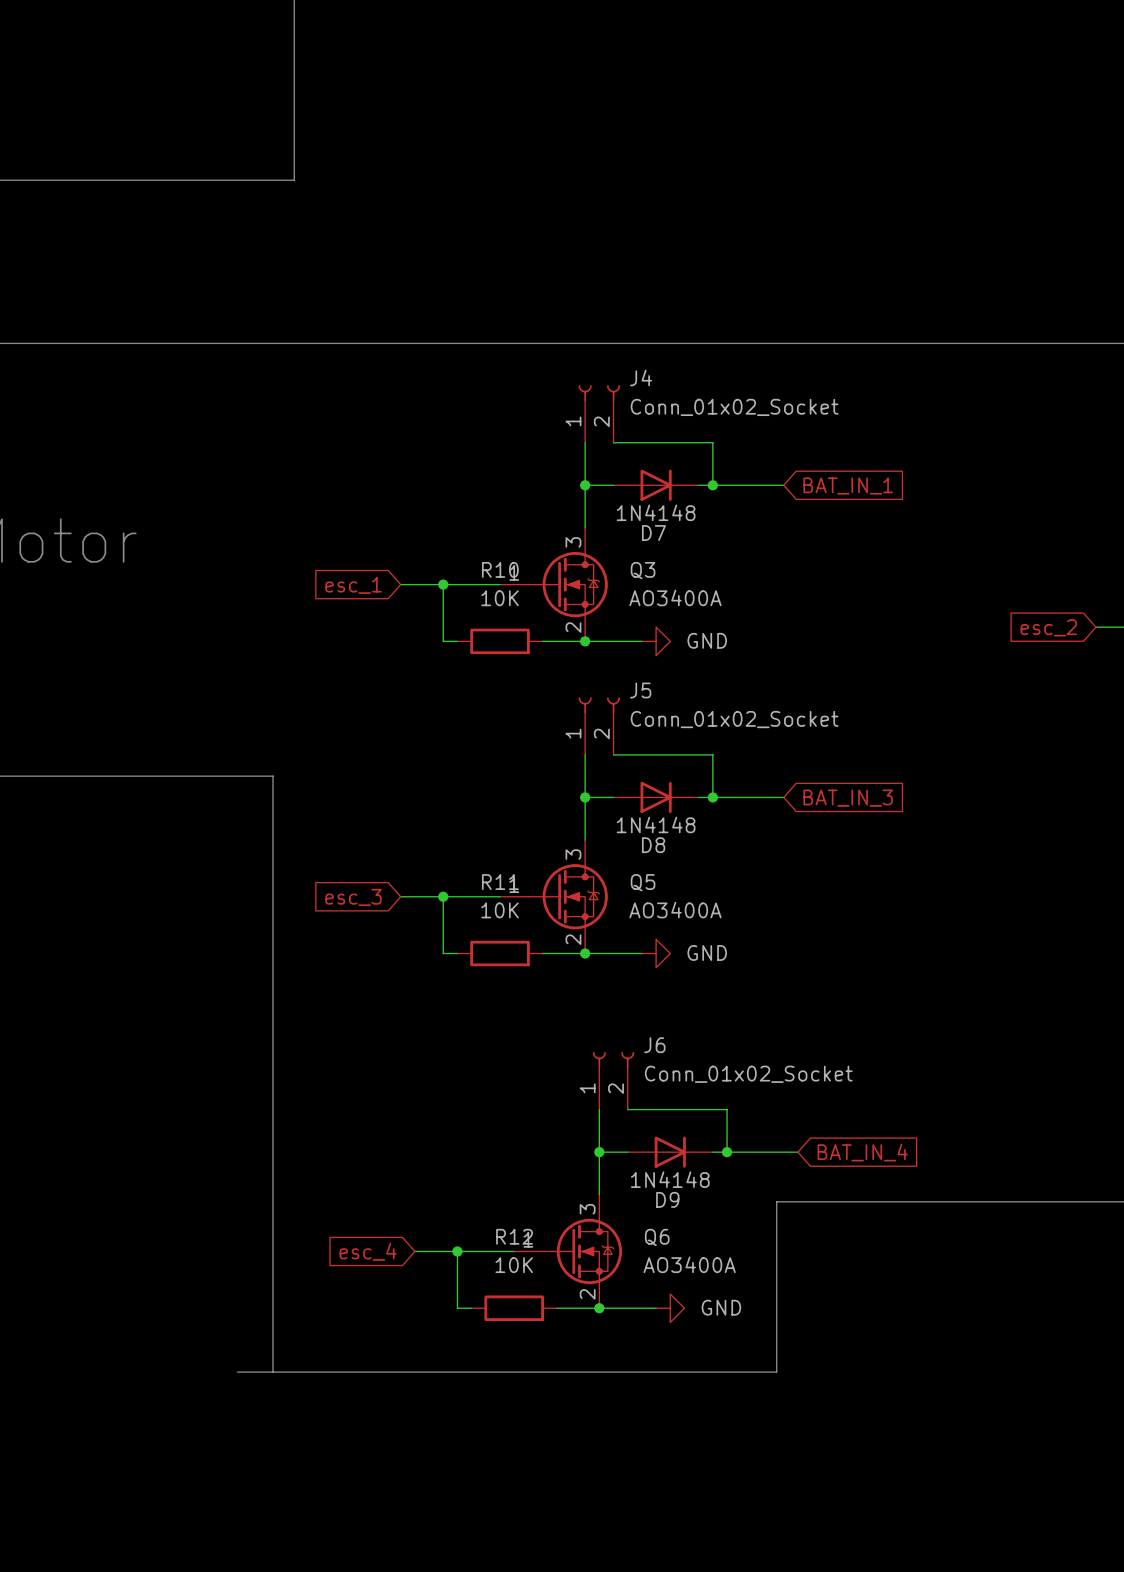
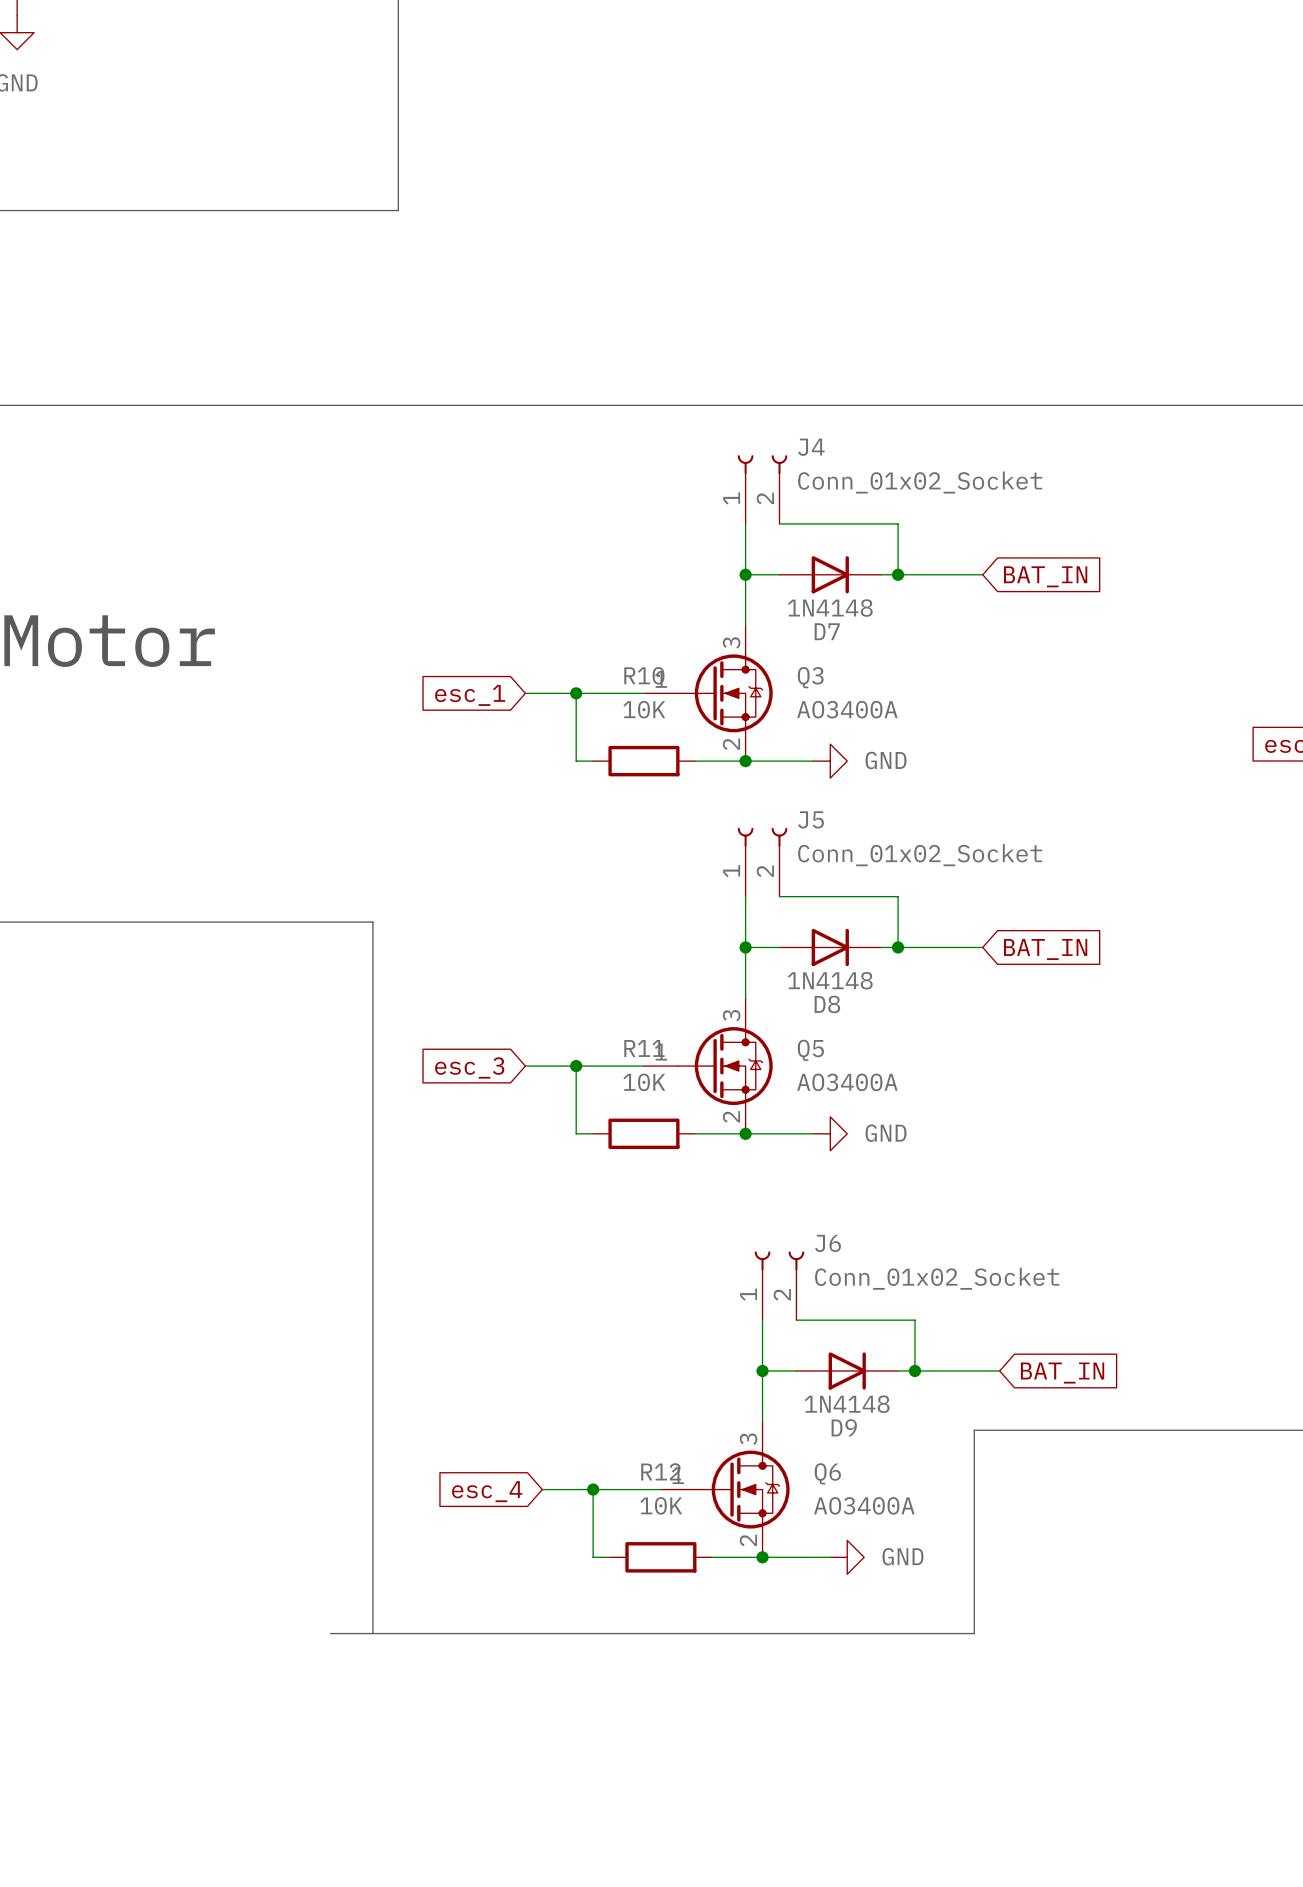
global label: BAT_IN_1 (848, 485) -> BAT_IN (1045, 576)
global label: BAT_IN_3 (848, 798) -> BAT_IN (1045, 949)
global label: BAT_IN_4 (862, 1152) -> BAT_IN (1062, 1373)

